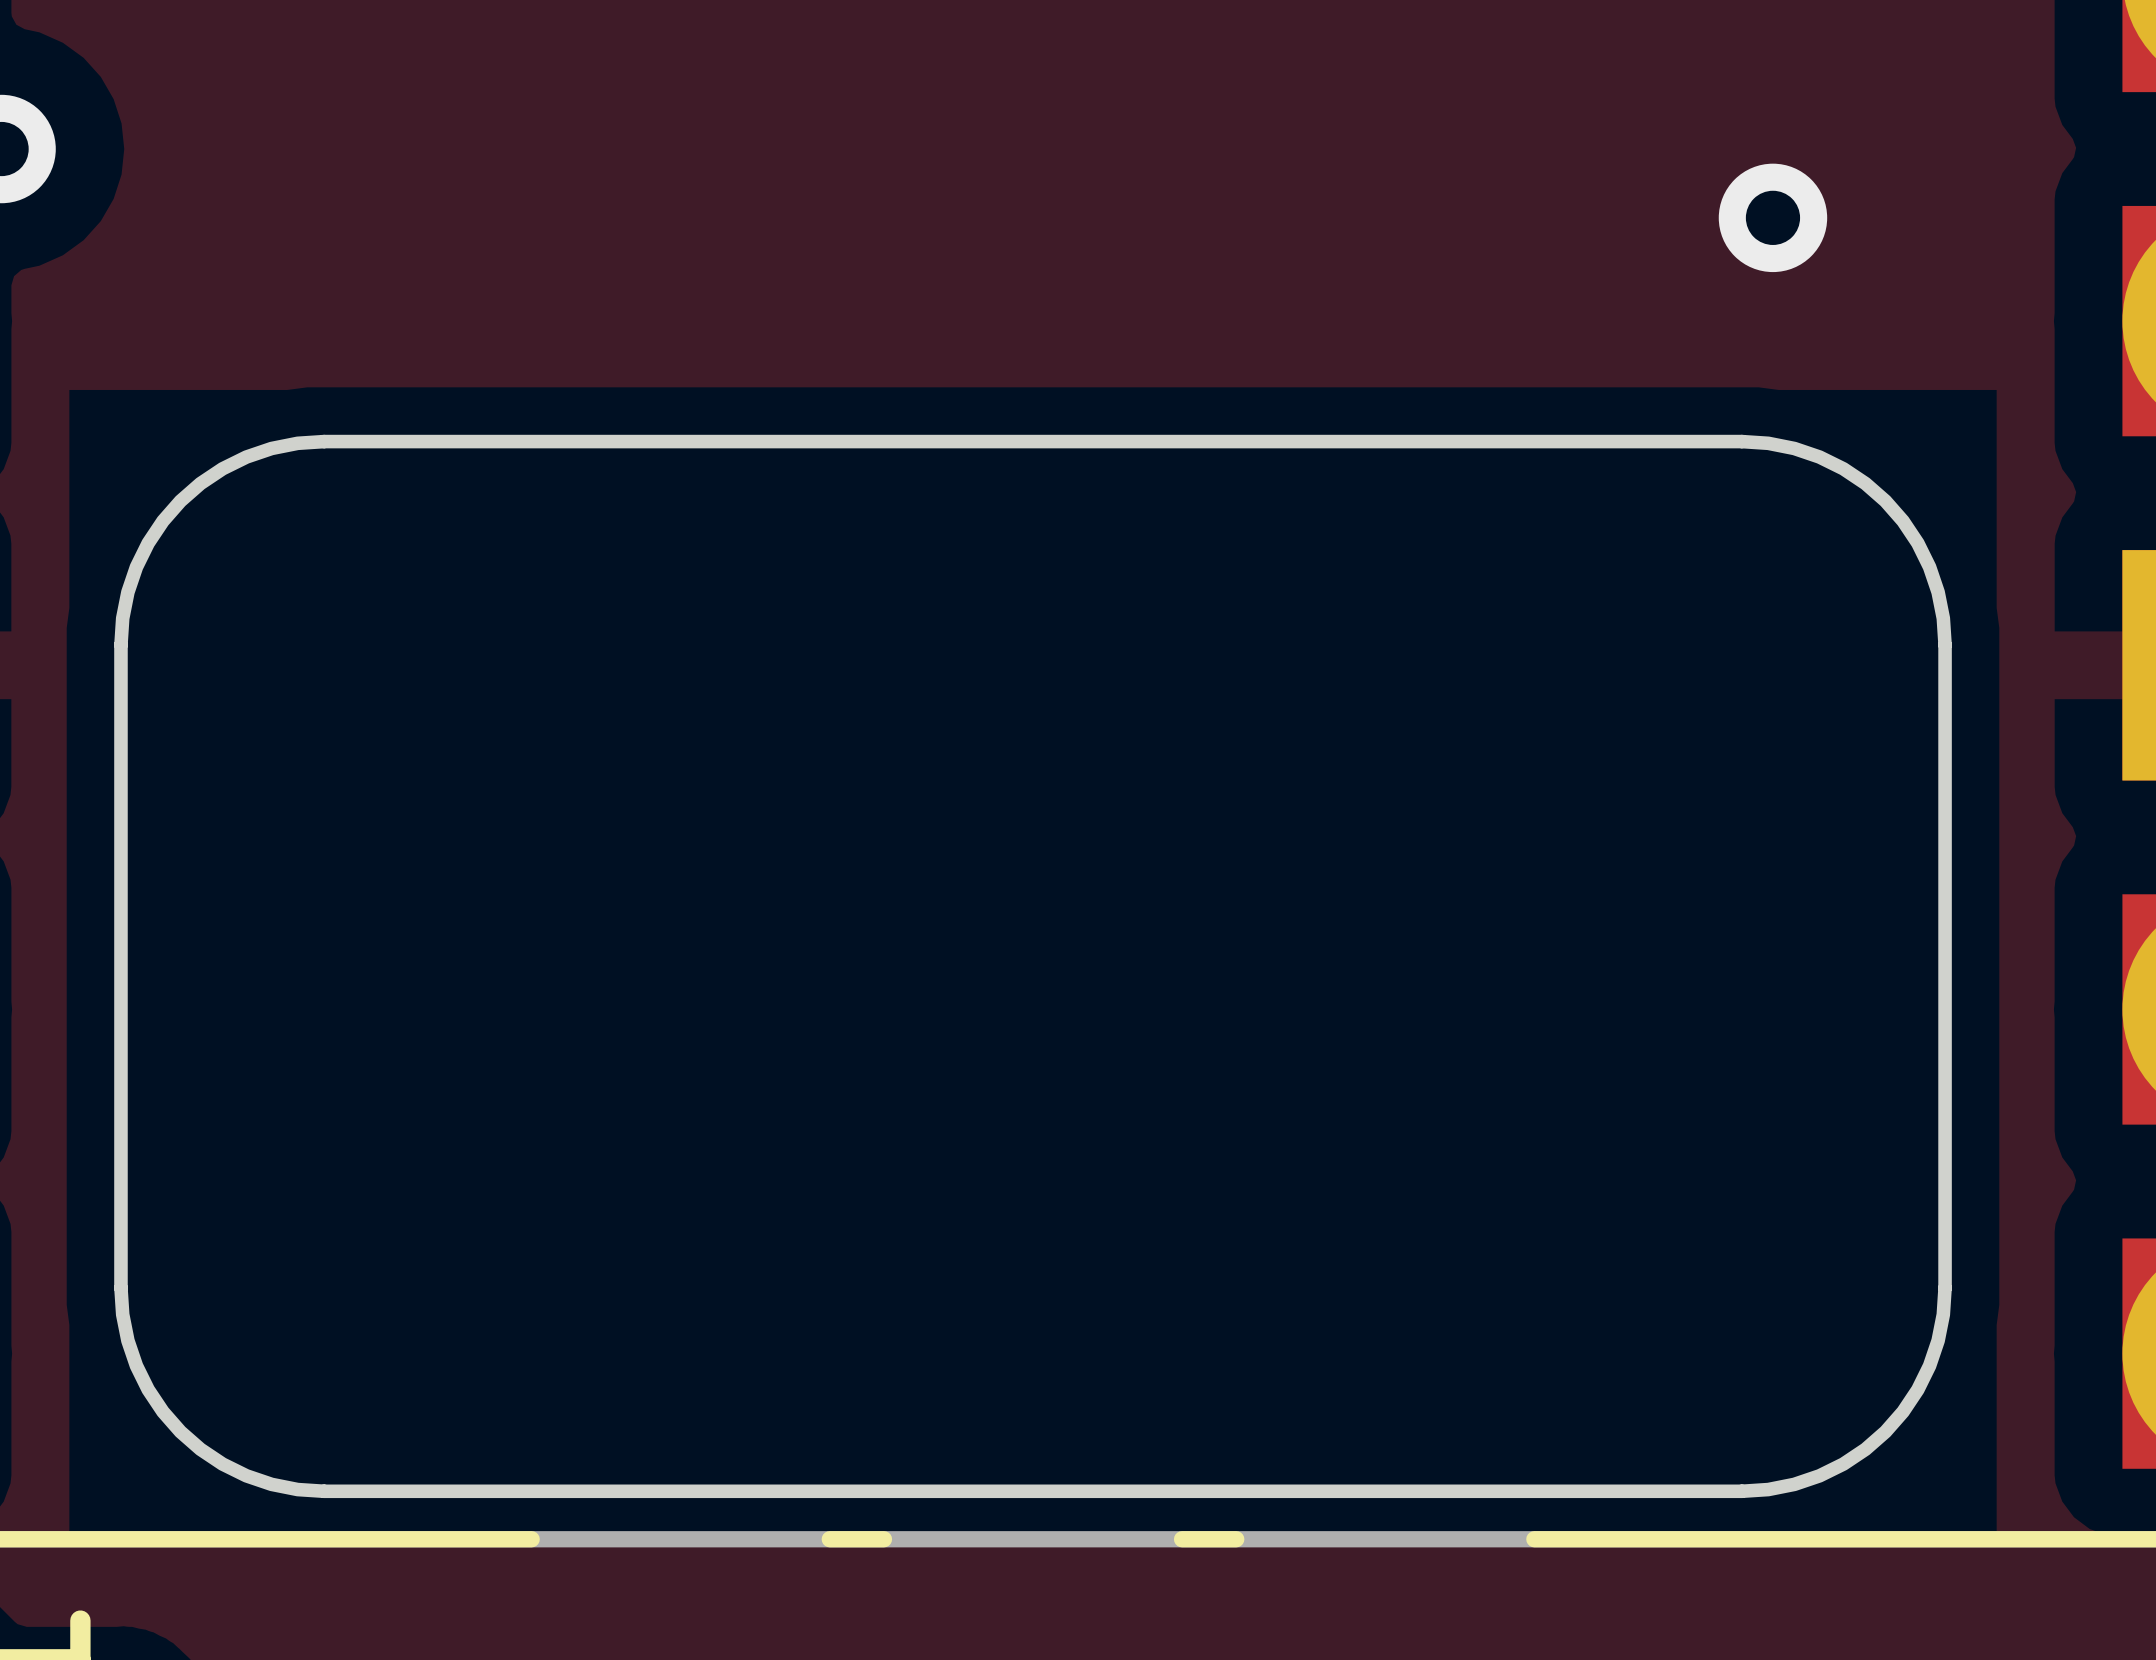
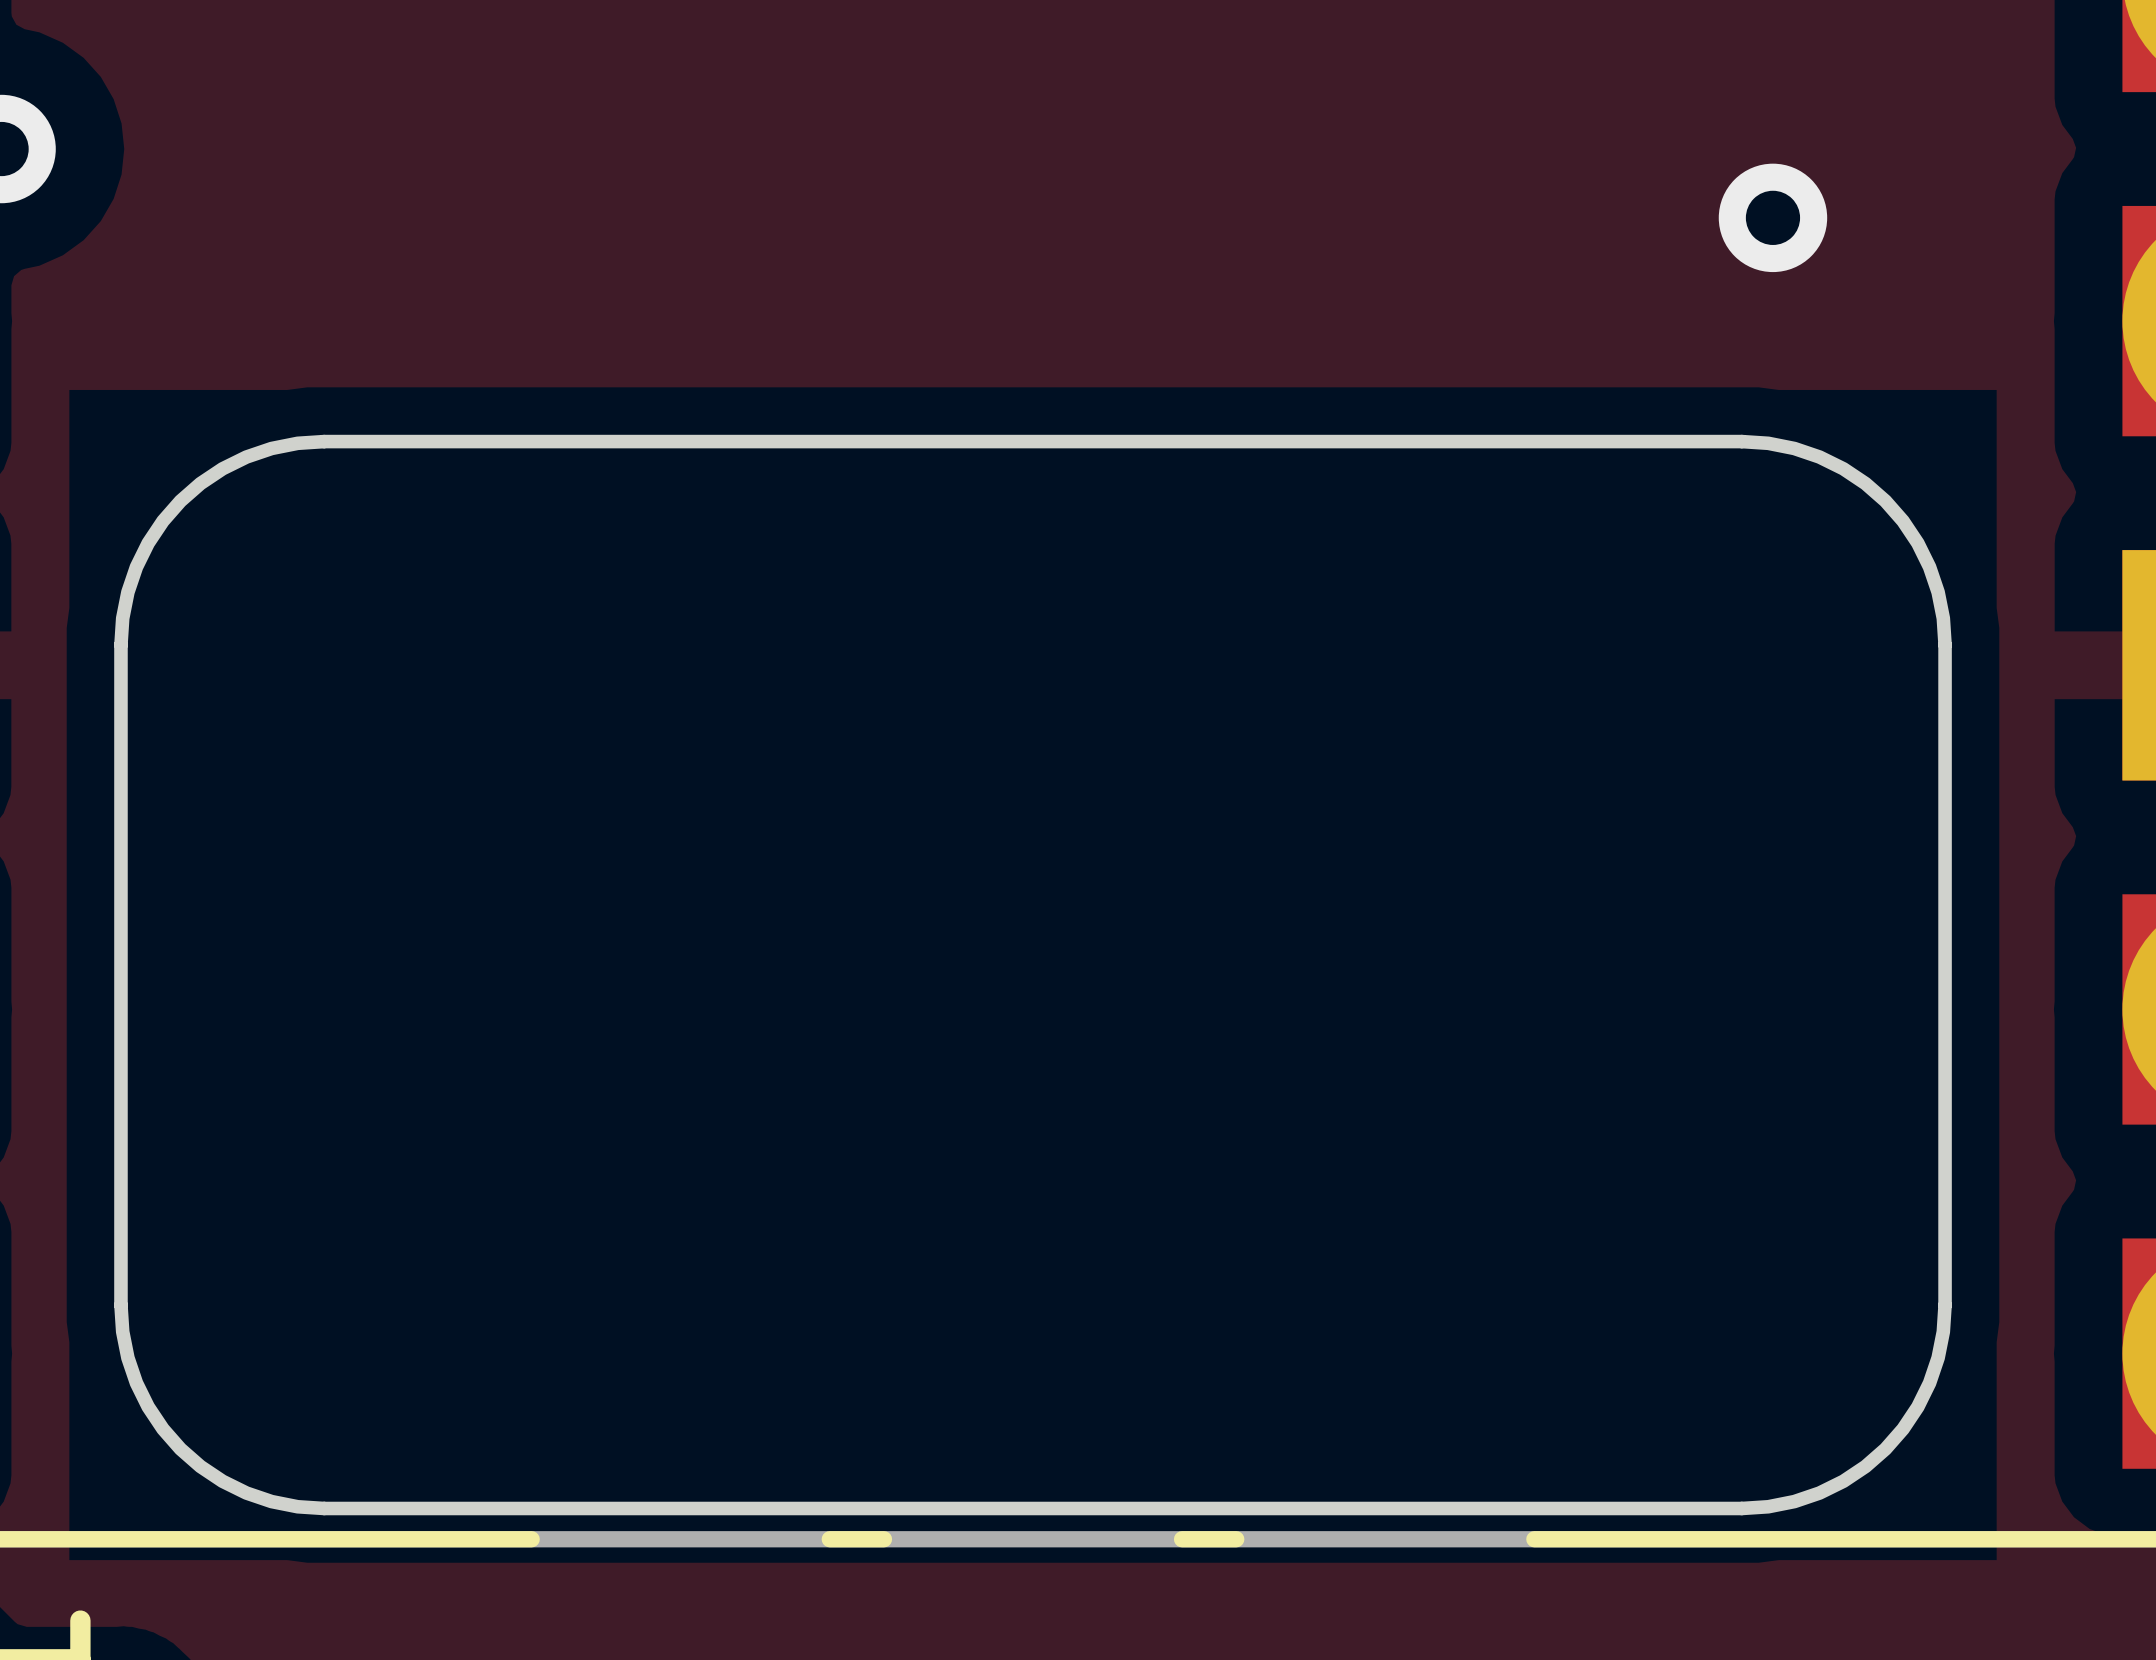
board edge: (120, 1288) (122, 1314) (127, 1340) (136, 1365) (148, 1389) (162, 1411) (180, 1431) (200, 1449) (222, 1464) (246, 1475) (271, 1484) (297, 1489) (324, 1491) (1741, 1491) (1768, 1489) (1794, 1484) (1819, 1475) (1843, 1464) (1865, 1449) (1885, 1431) (1903, 1411) (1917, 1389) (1929, 1365) (1938, 1340) (1943, 1314) (1945, 1288) -> (120, 1288) (122, 1331) (127, 1357) (136, 1383) (148, 1406) (162, 1428) (180, 1448) (200, 1466) (222, 1481) (246, 1493) (271, 1501) (297, 1506) (324, 1508) (1741, 1508) (1768, 1506) (1794, 1501) (1819, 1493) (1843, 1481) (1865, 1466) (1885, 1448) (1903, 1428) (1917, 1406) (1929, 1383) (1938, 1357) (1943, 1331) (1945, 1288)

